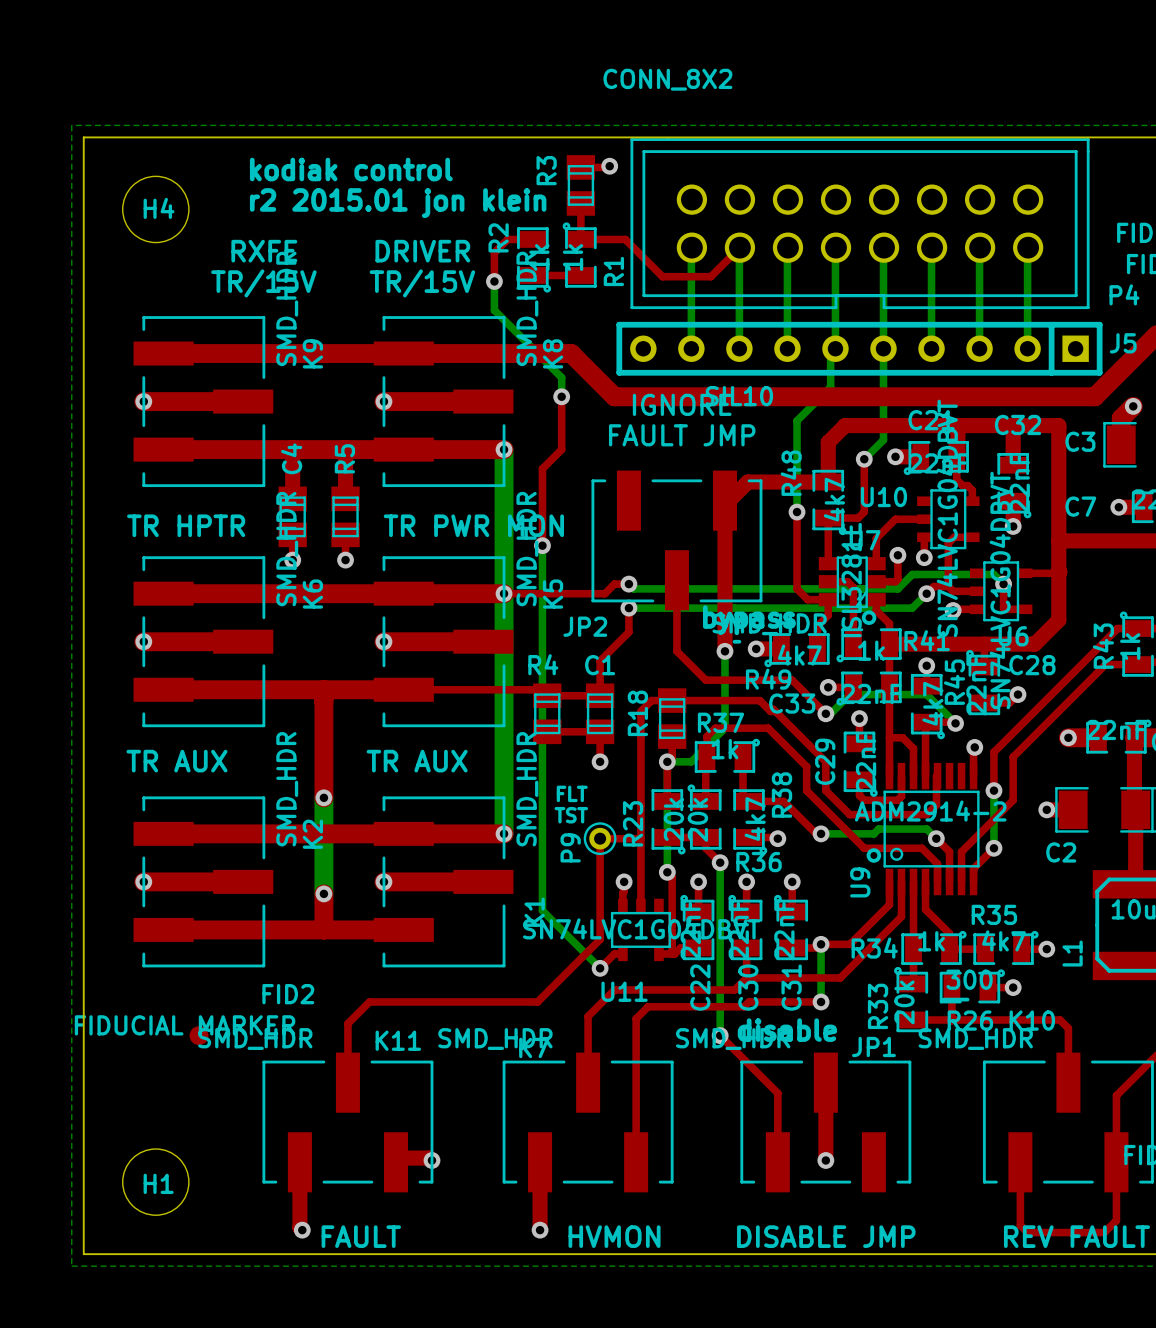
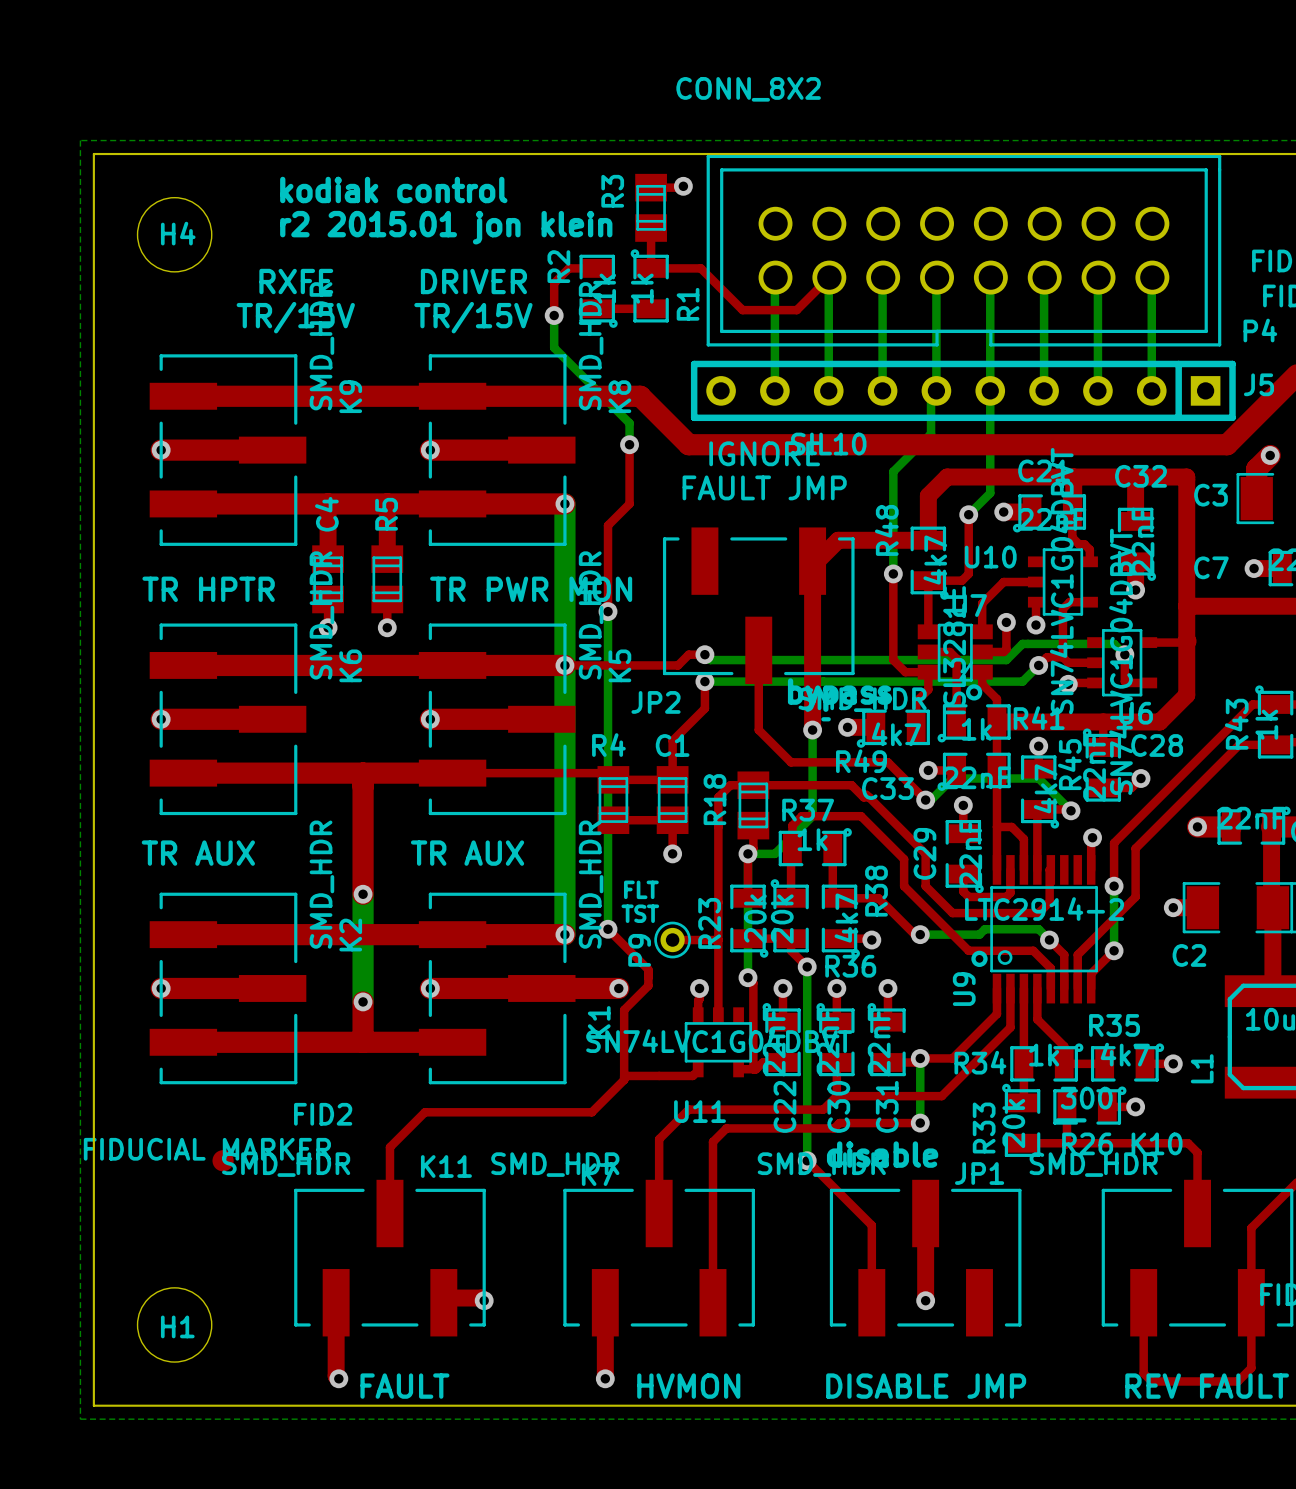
U9 value: ADM2914-2 (930, 811) -> LTC2914-2 (1044, 909)
bottom track: (542, 829) (542, 910) (600, 968) -> none
via: none -> (608, 929)
top track: (600, 838) (600, 939) (537, 1001) (369, 1001) -> (608, 929) (648, 969) (648, 985) (624, 1010) (624, 1079) (591, 1112) (424, 1112) (414, 1123)
top track: none -> (538, 988) (618, 988)
via: none -> (618, 988)
top track: (622, 953) (614, 953) (600, 968) -> none
top track: none -> (698, 1070) (692, 1075) (624, 1075)
via: (600, 968) -> none

